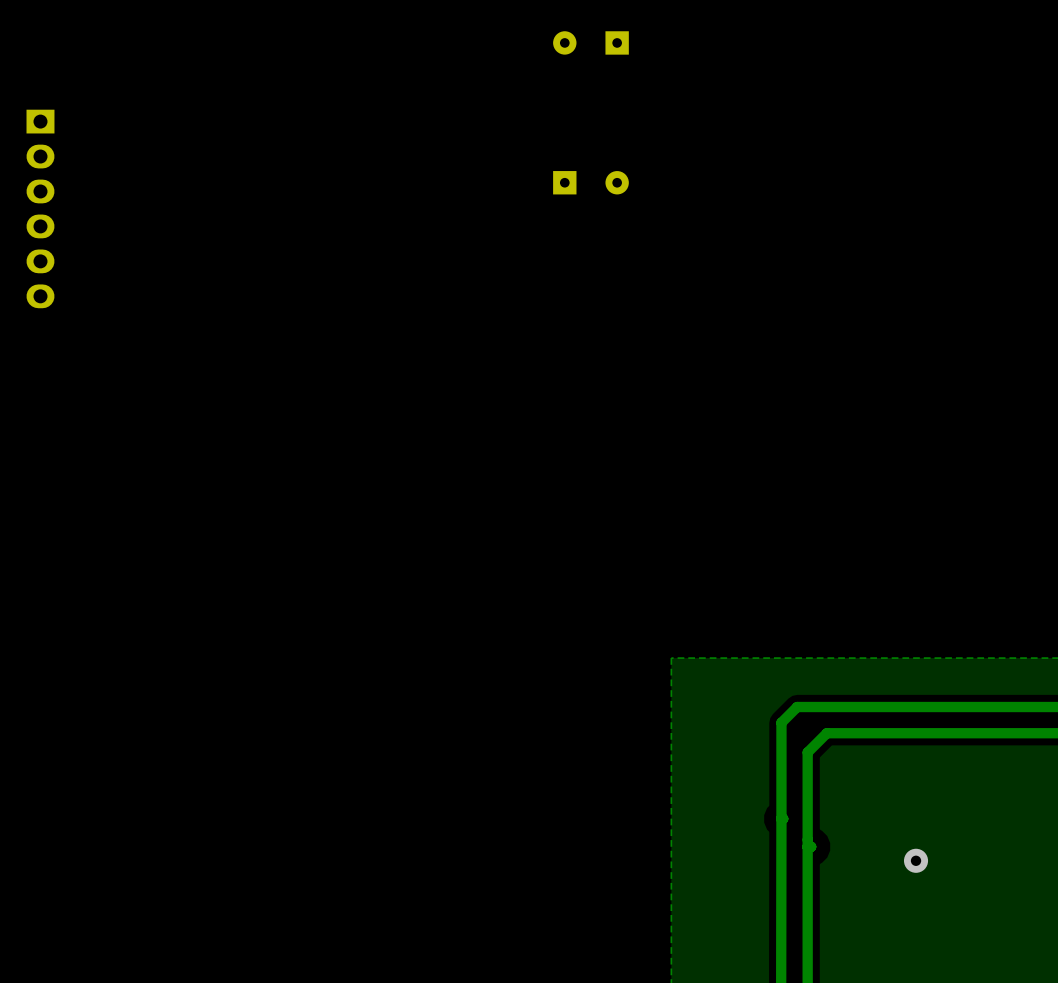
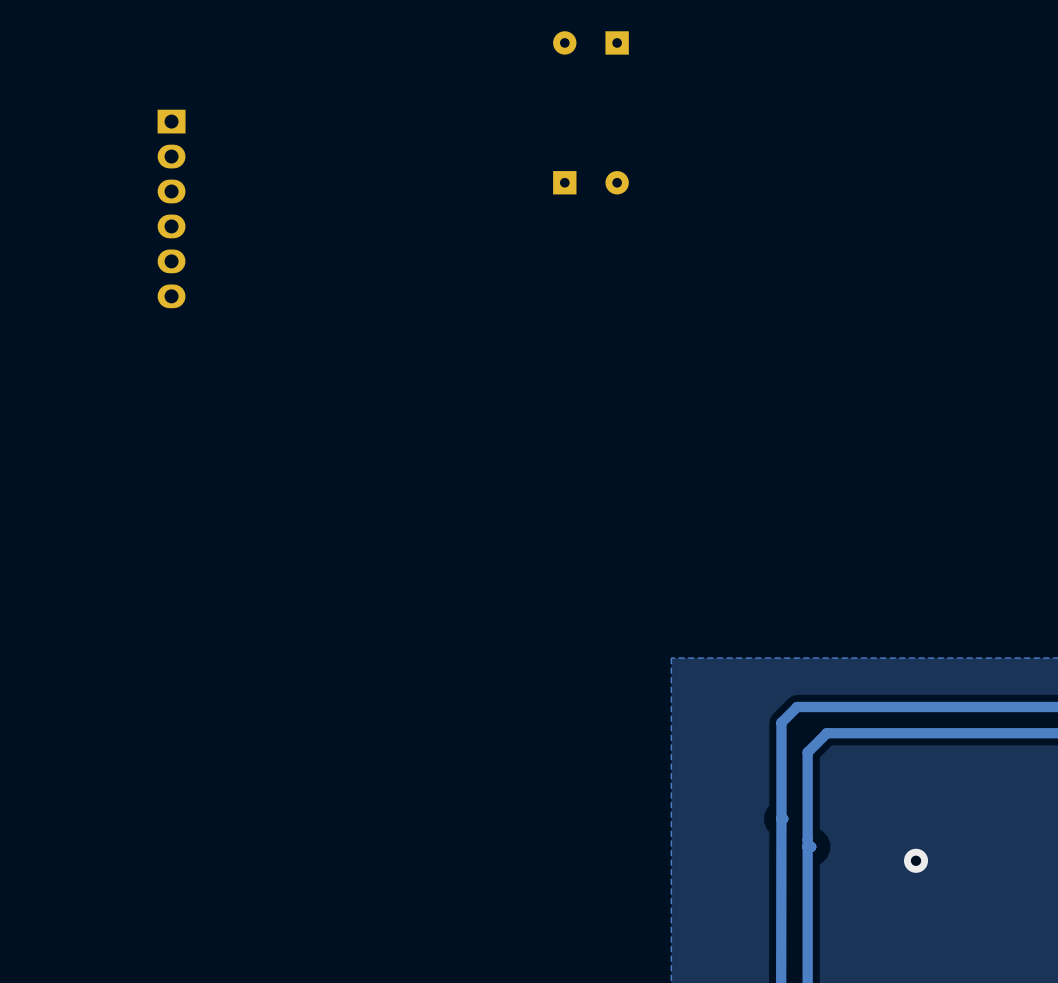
part position: (40, 208) -> (171, 208)

